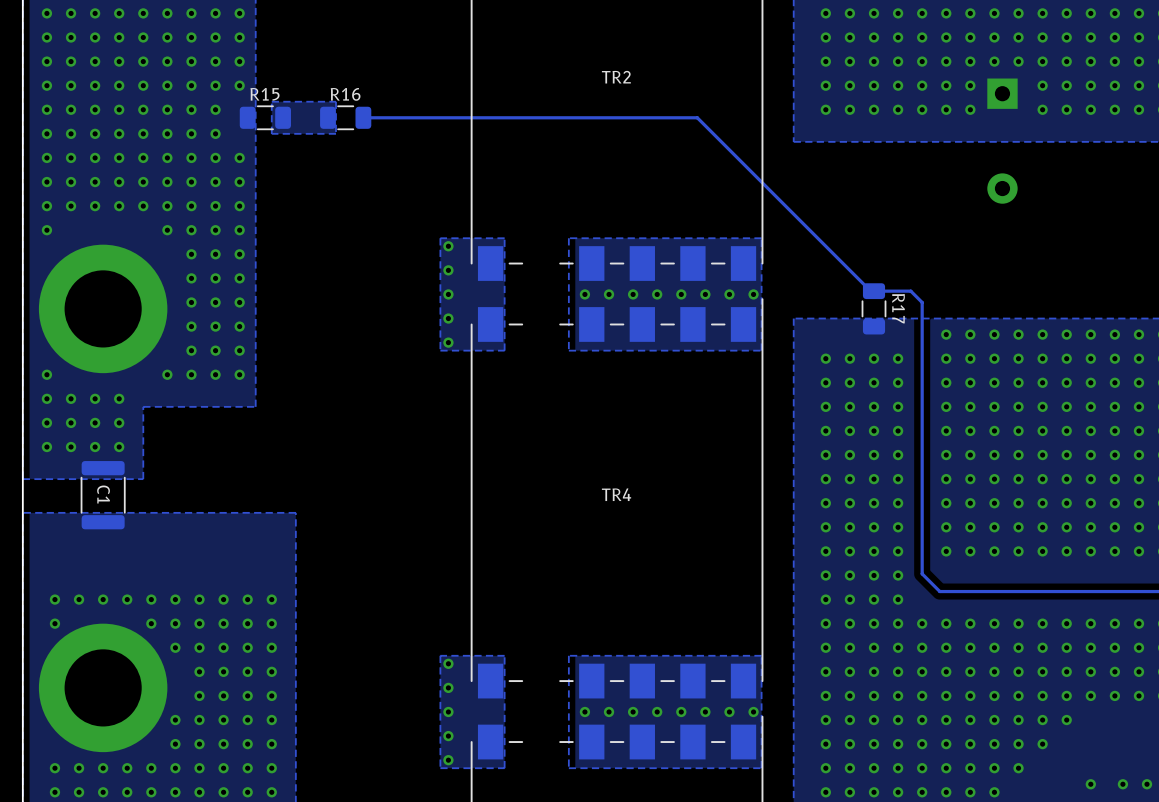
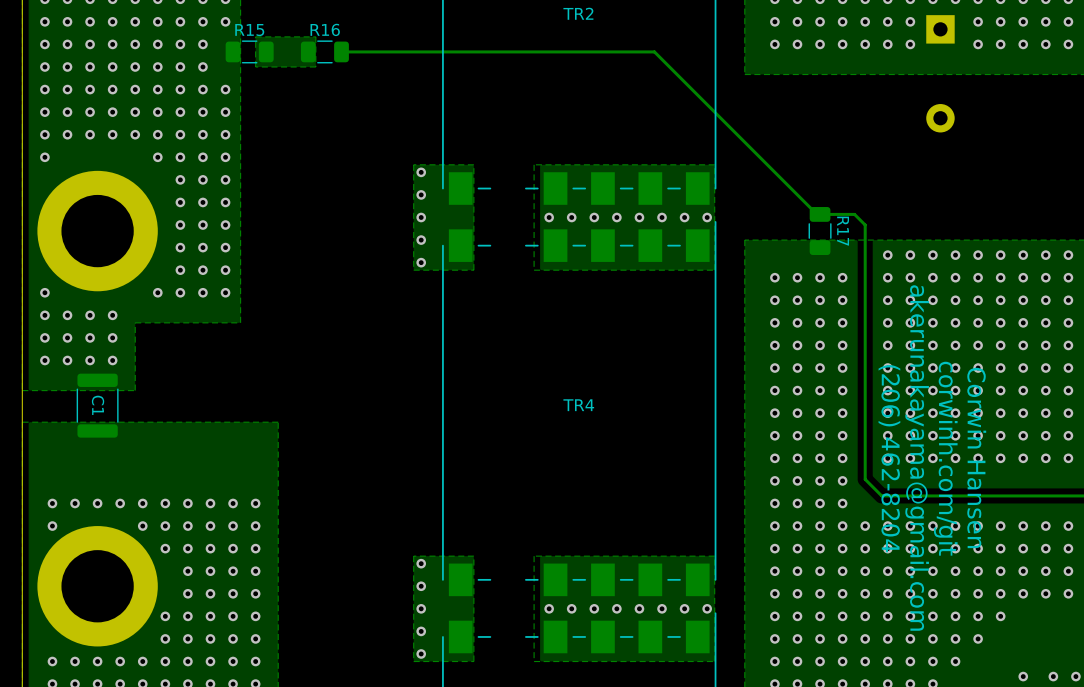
text: none -> akerunakayama@gmail.com (917, 458)
text: none -> Corwin Hansen (976, 457)
text: none -> (206) 462-8204 (889, 458)
text: none -> corwinh.com/git (945, 458)

